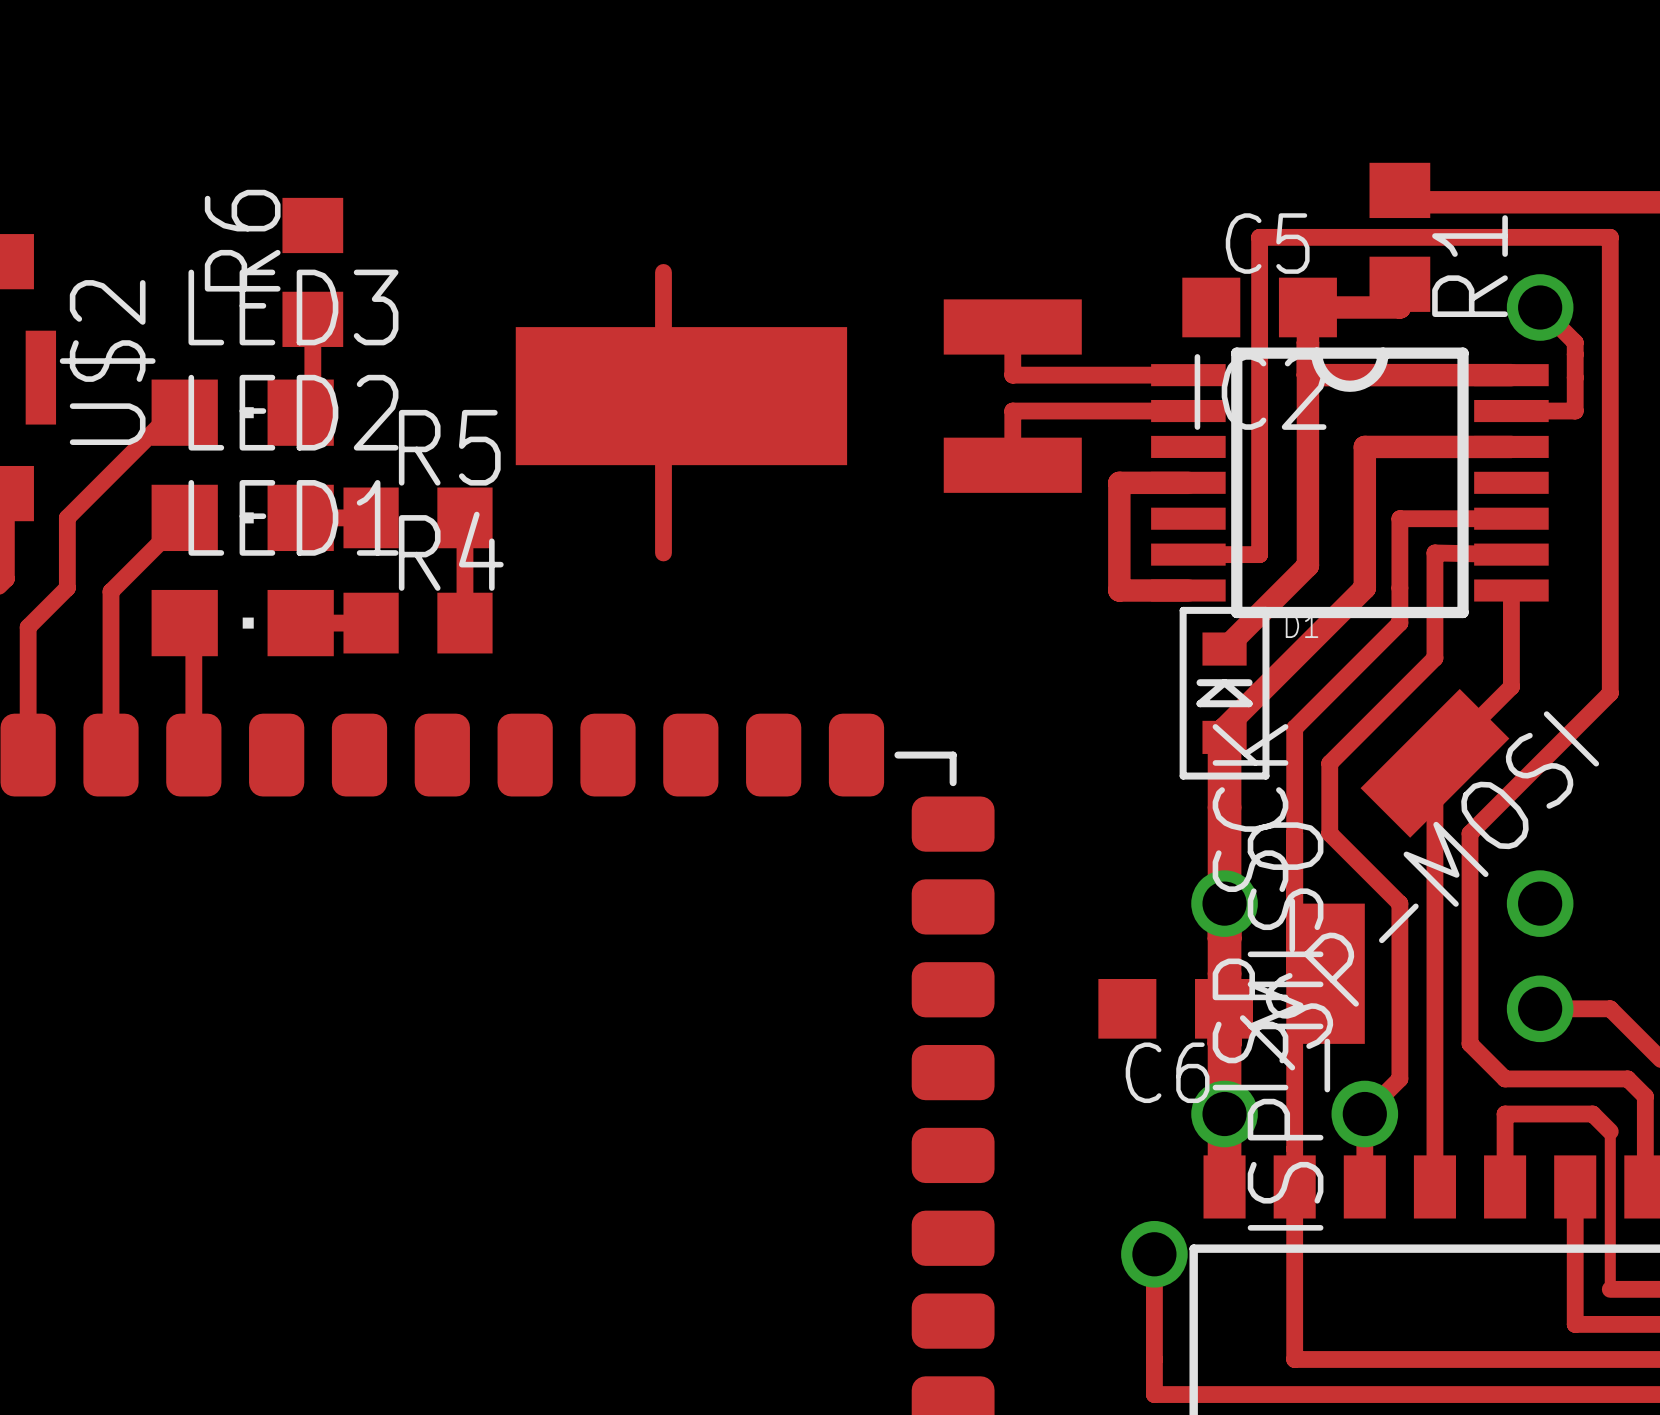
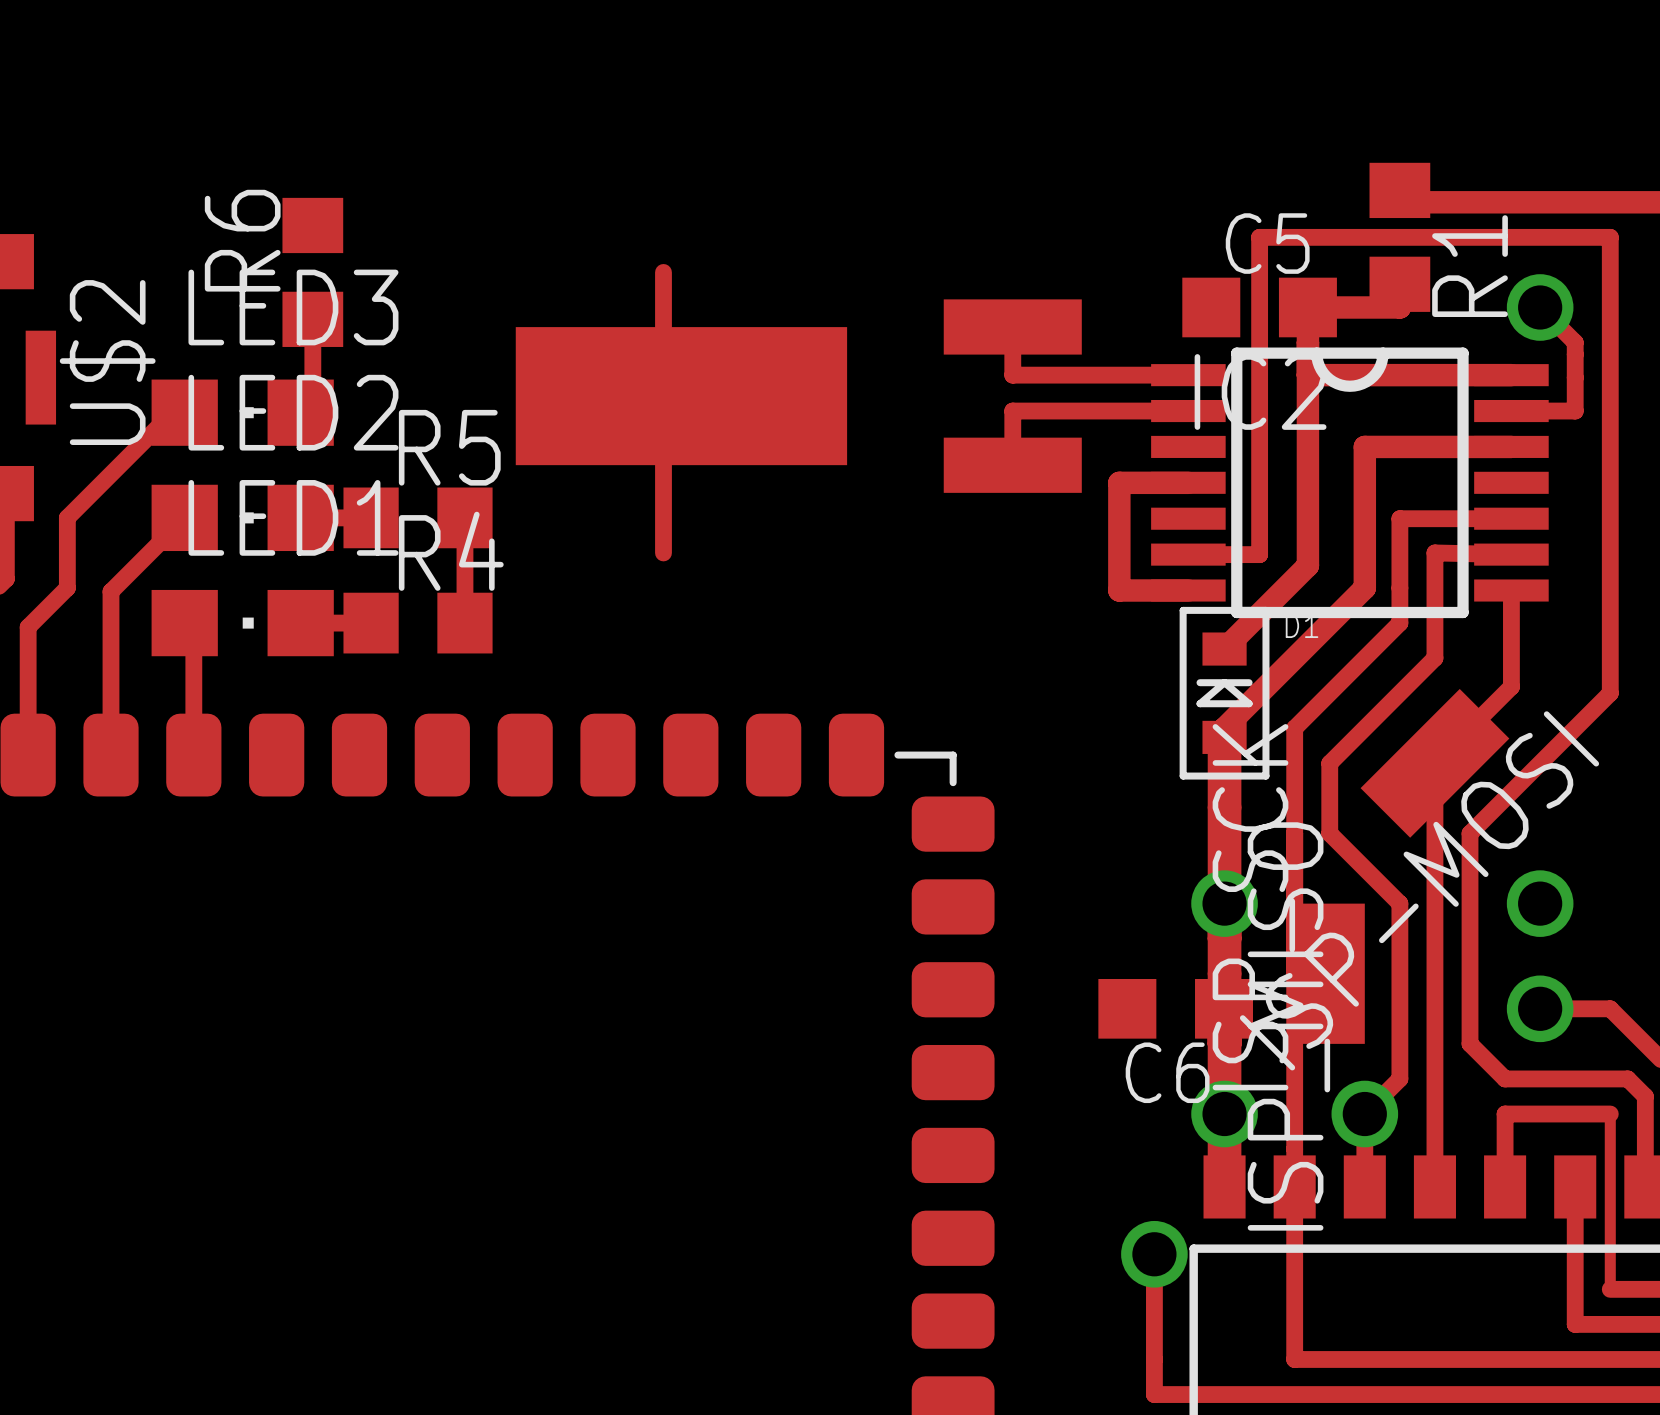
track: (1592, 1114) (1610, 1131) -> (1592, 1114) (1610, 1114) (1610, 1131)

